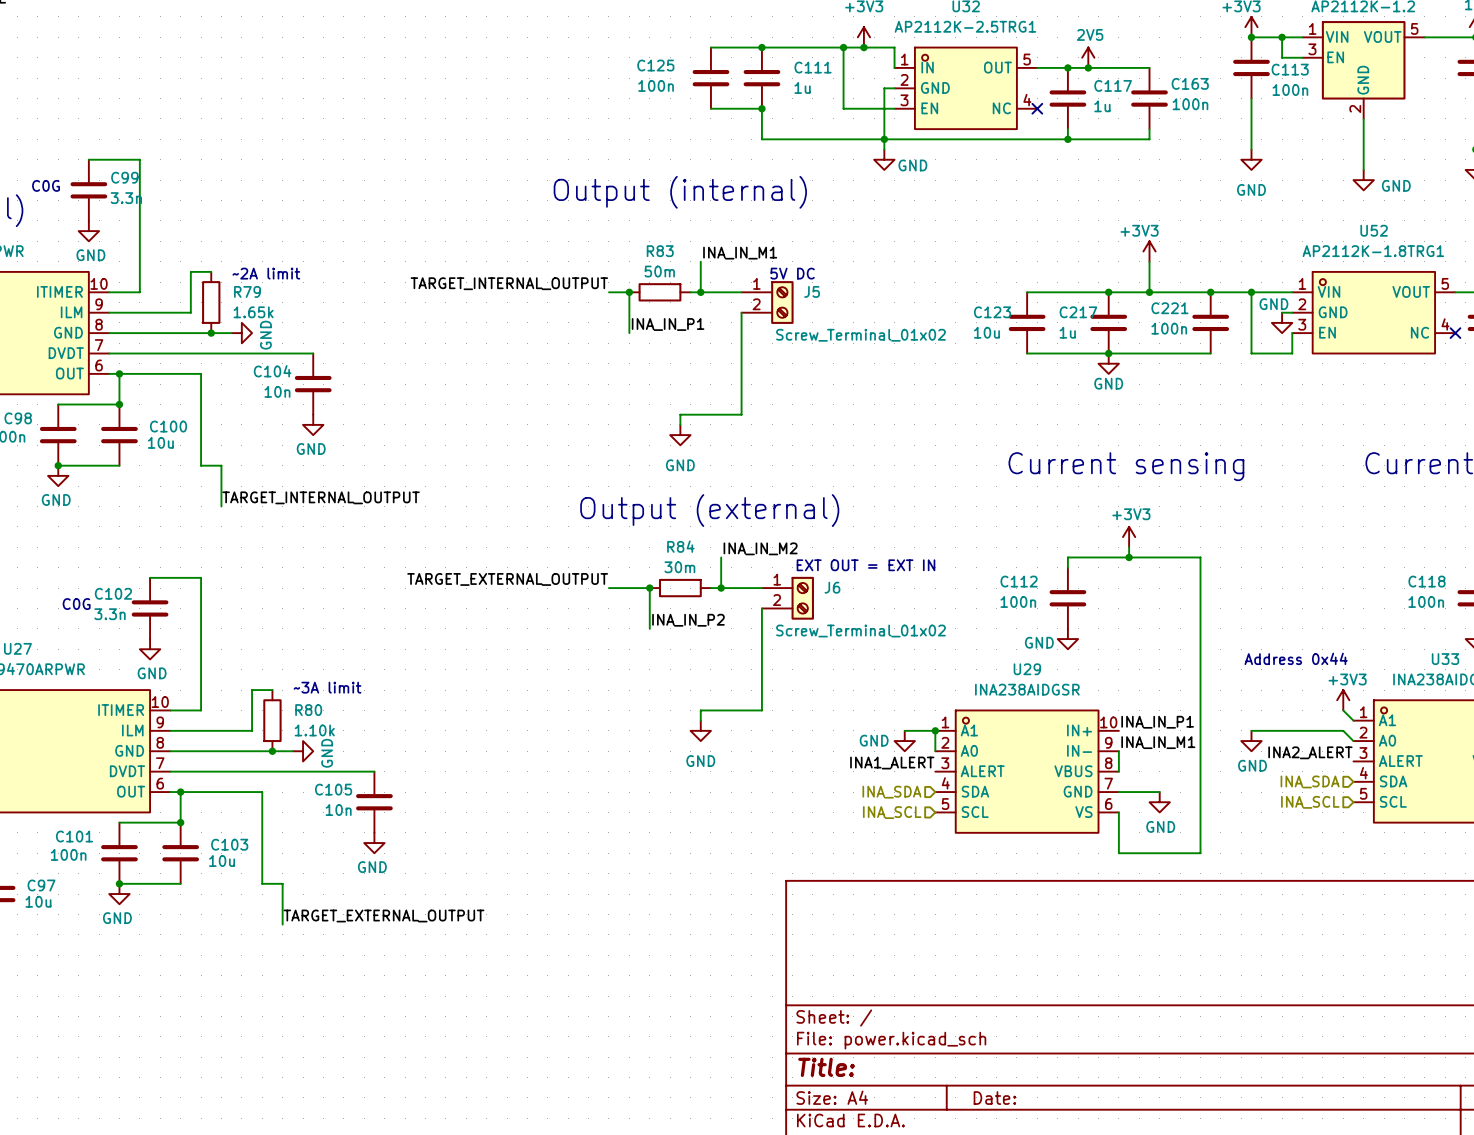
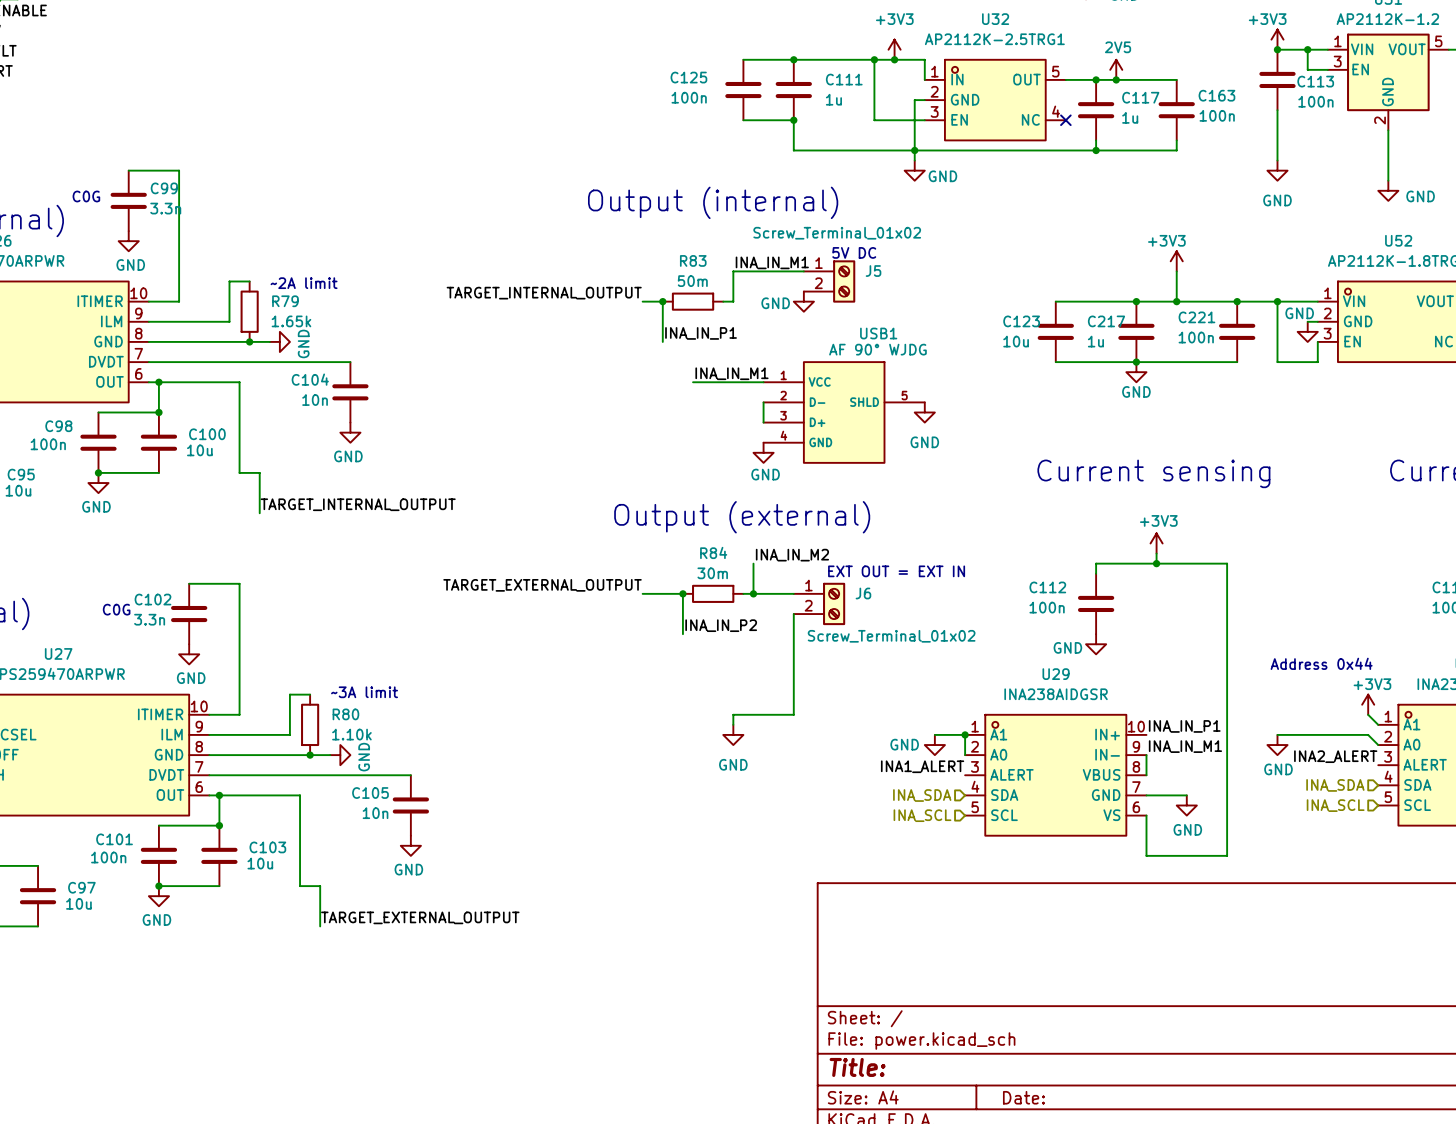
wire: none -> (733, 271) (803, 271)
text position: 5V DC (792, 273) -> 5V DC (854, 252)
wire: (700, 292) (741, 292) -> none
junction: (700, 292) -> none
power symbol: none -> GND (803, 301)
J5 position: (767, 302) -> (829, 281)
wire: (741, 312) (741, 414) (680, 414) (680, 424) -> none
J5 value position: Screw_Terminal_01x02 (860, 335) -> Screw_Terminal_01x02 (837, 233)
label: none -> INA_IN_M1 (731, 373)
wire: none -> (693, 382) (763, 382)
wire: none -> (763, 402) (763, 422)
USB1: none -> AF 90° WJDG (844, 412)
power symbol: none -> GND (924, 412)
power symbol position: GND (680, 435) -> GND (763, 452)
power symbol text position: GND (680, 465) -> GND (765, 474)

